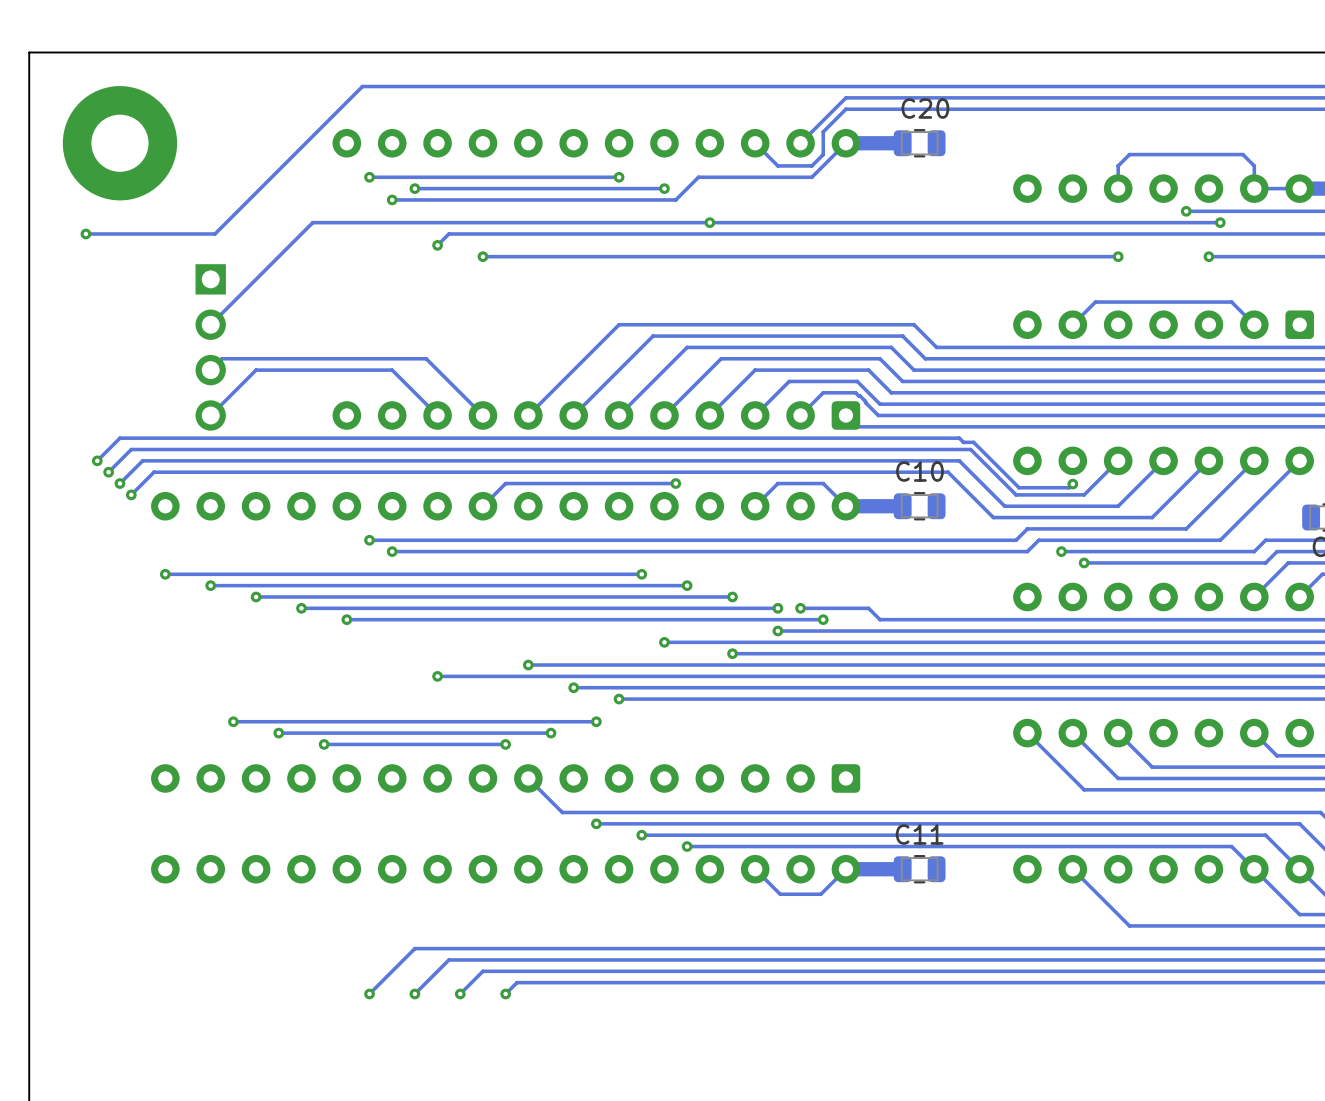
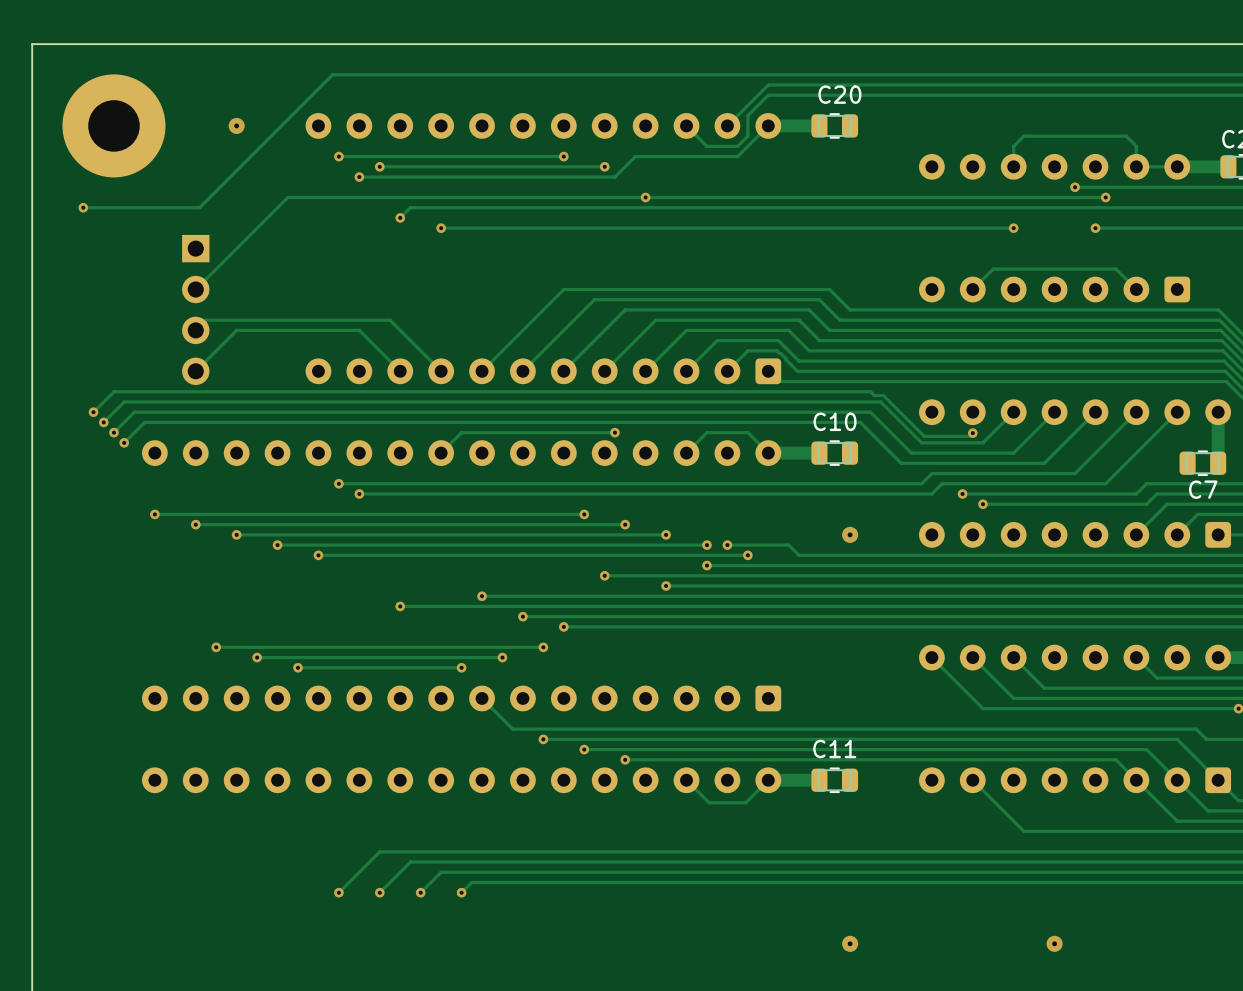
via: none -> (236, 125)
via: none -> (850, 534)
via: none -> (850, 943)
via: none -> (1054, 943)

